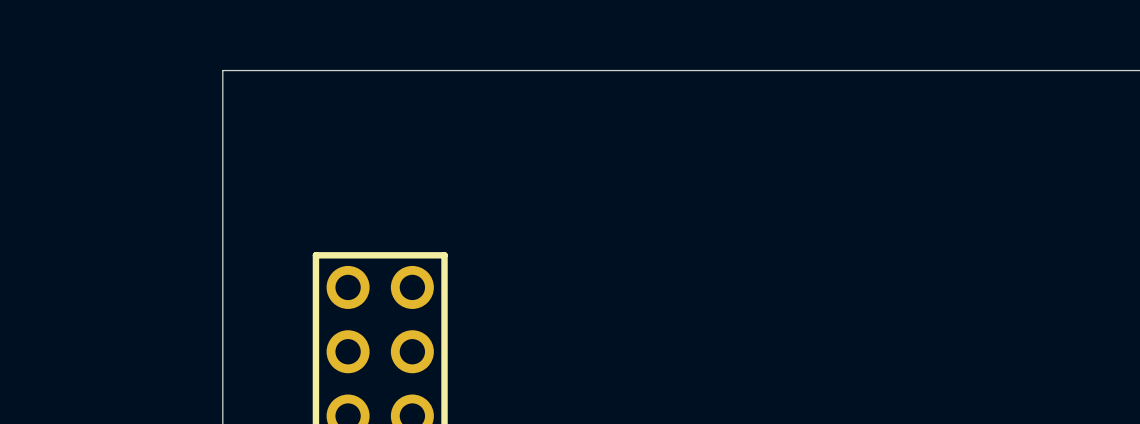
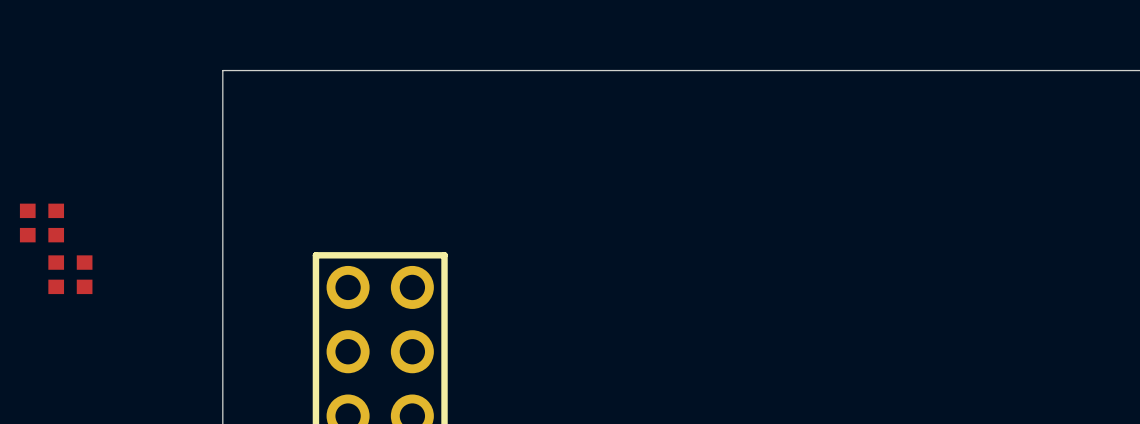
part: none -> (27, 223)
part: none -> (56, 223)
part: none -> (56, 274)
part: none -> (84, 274)

